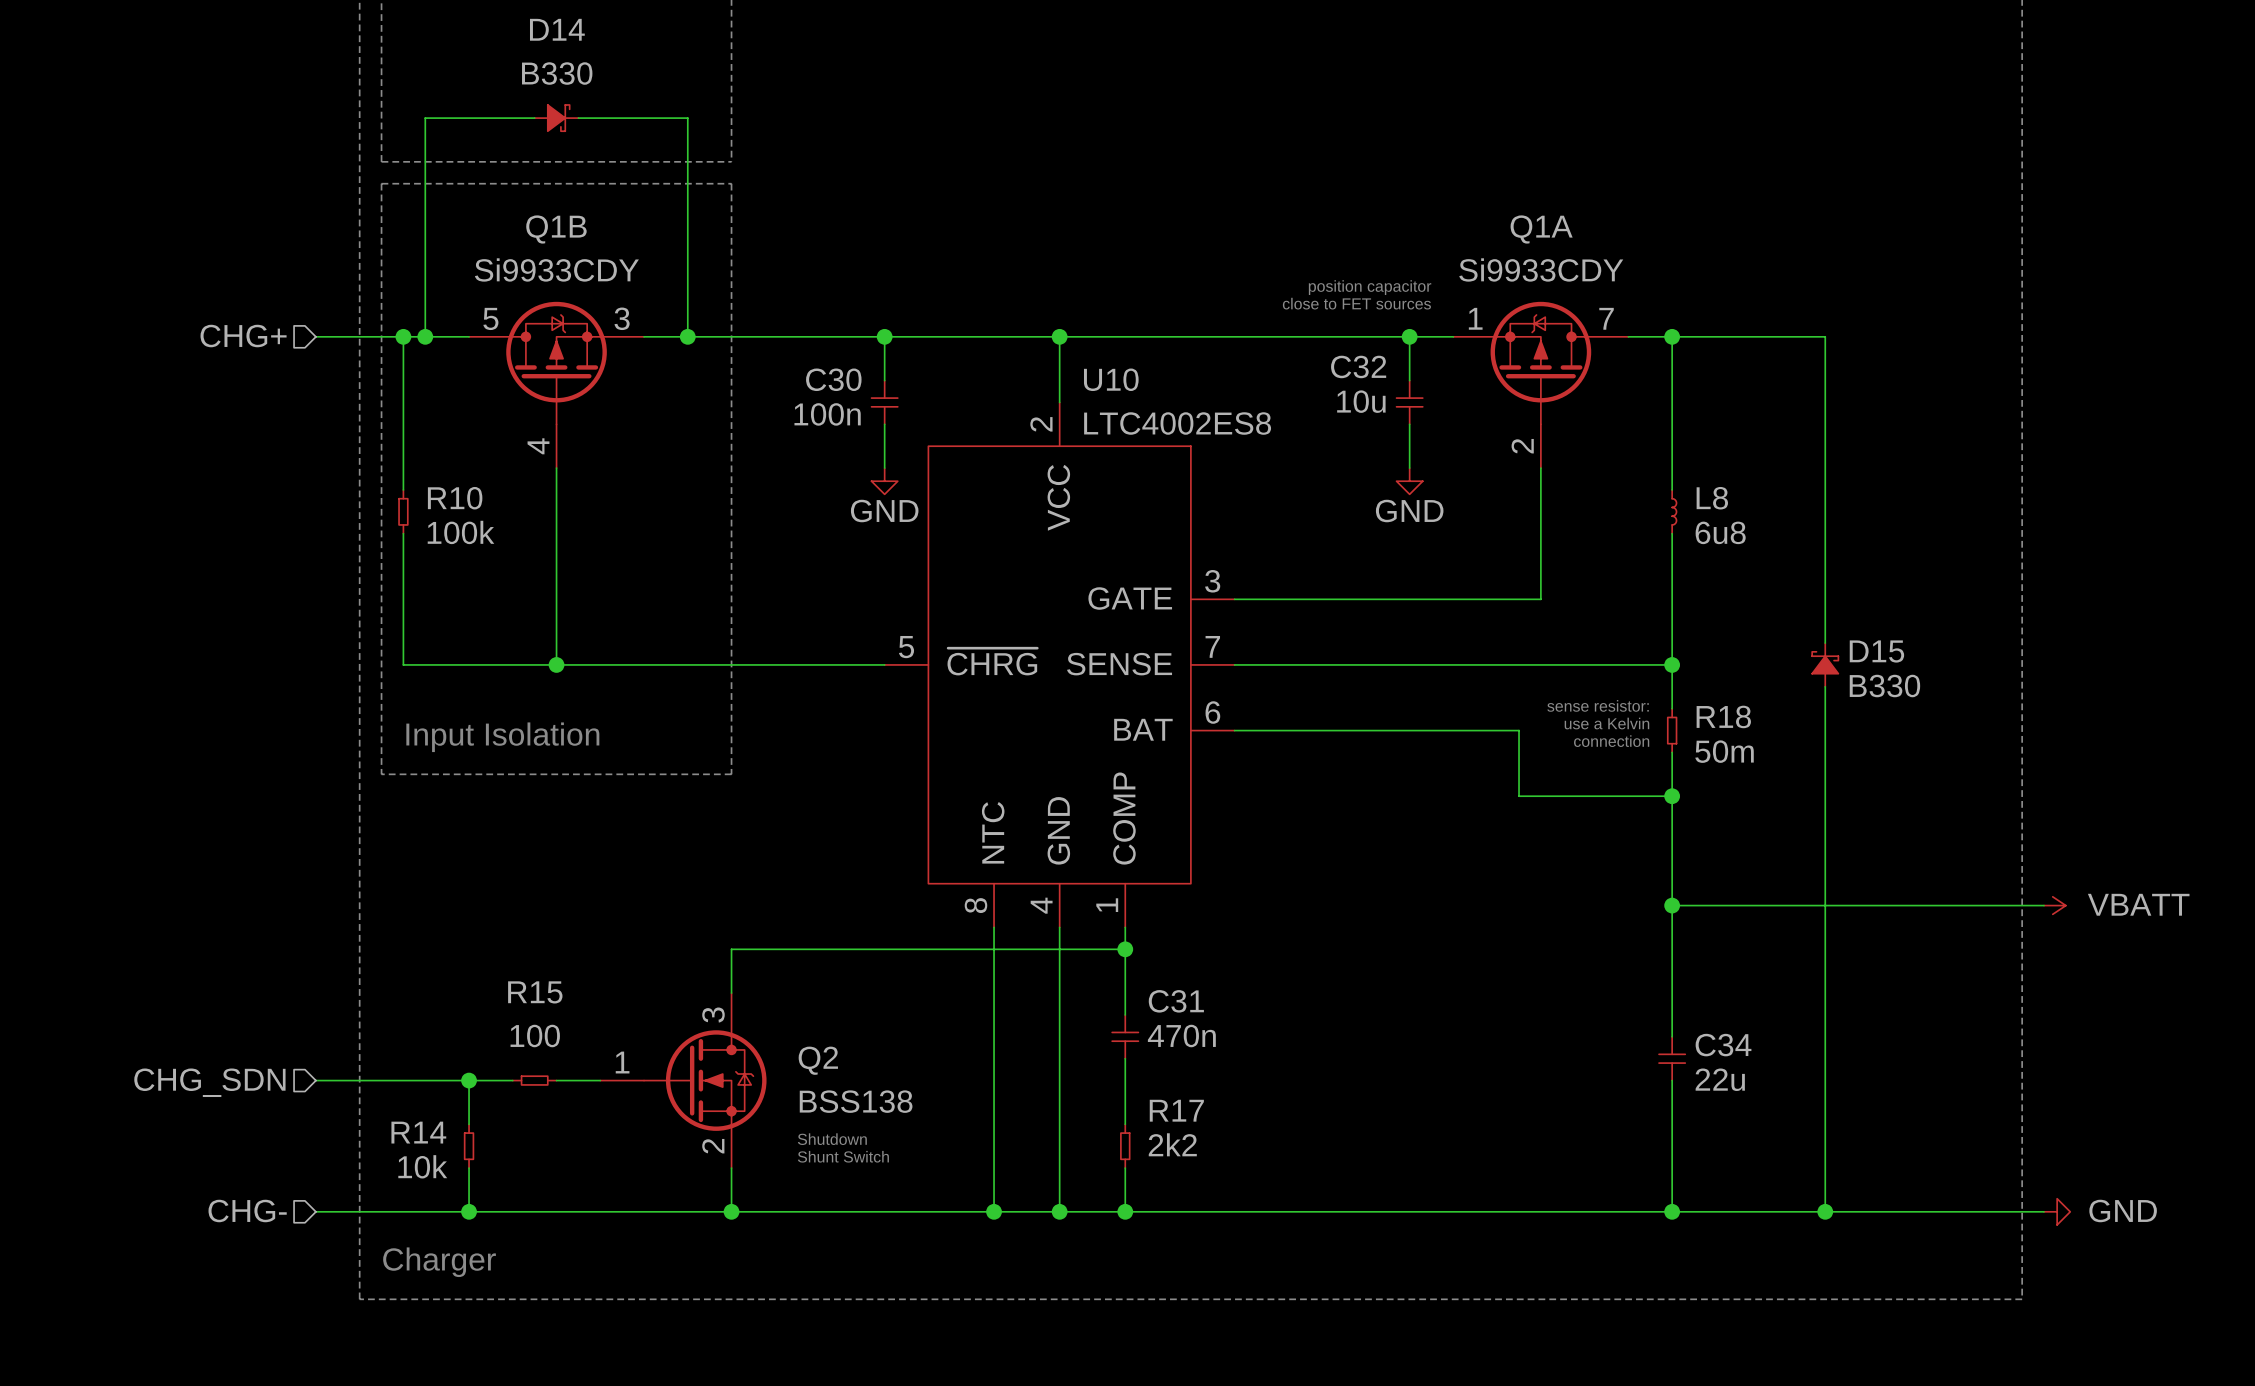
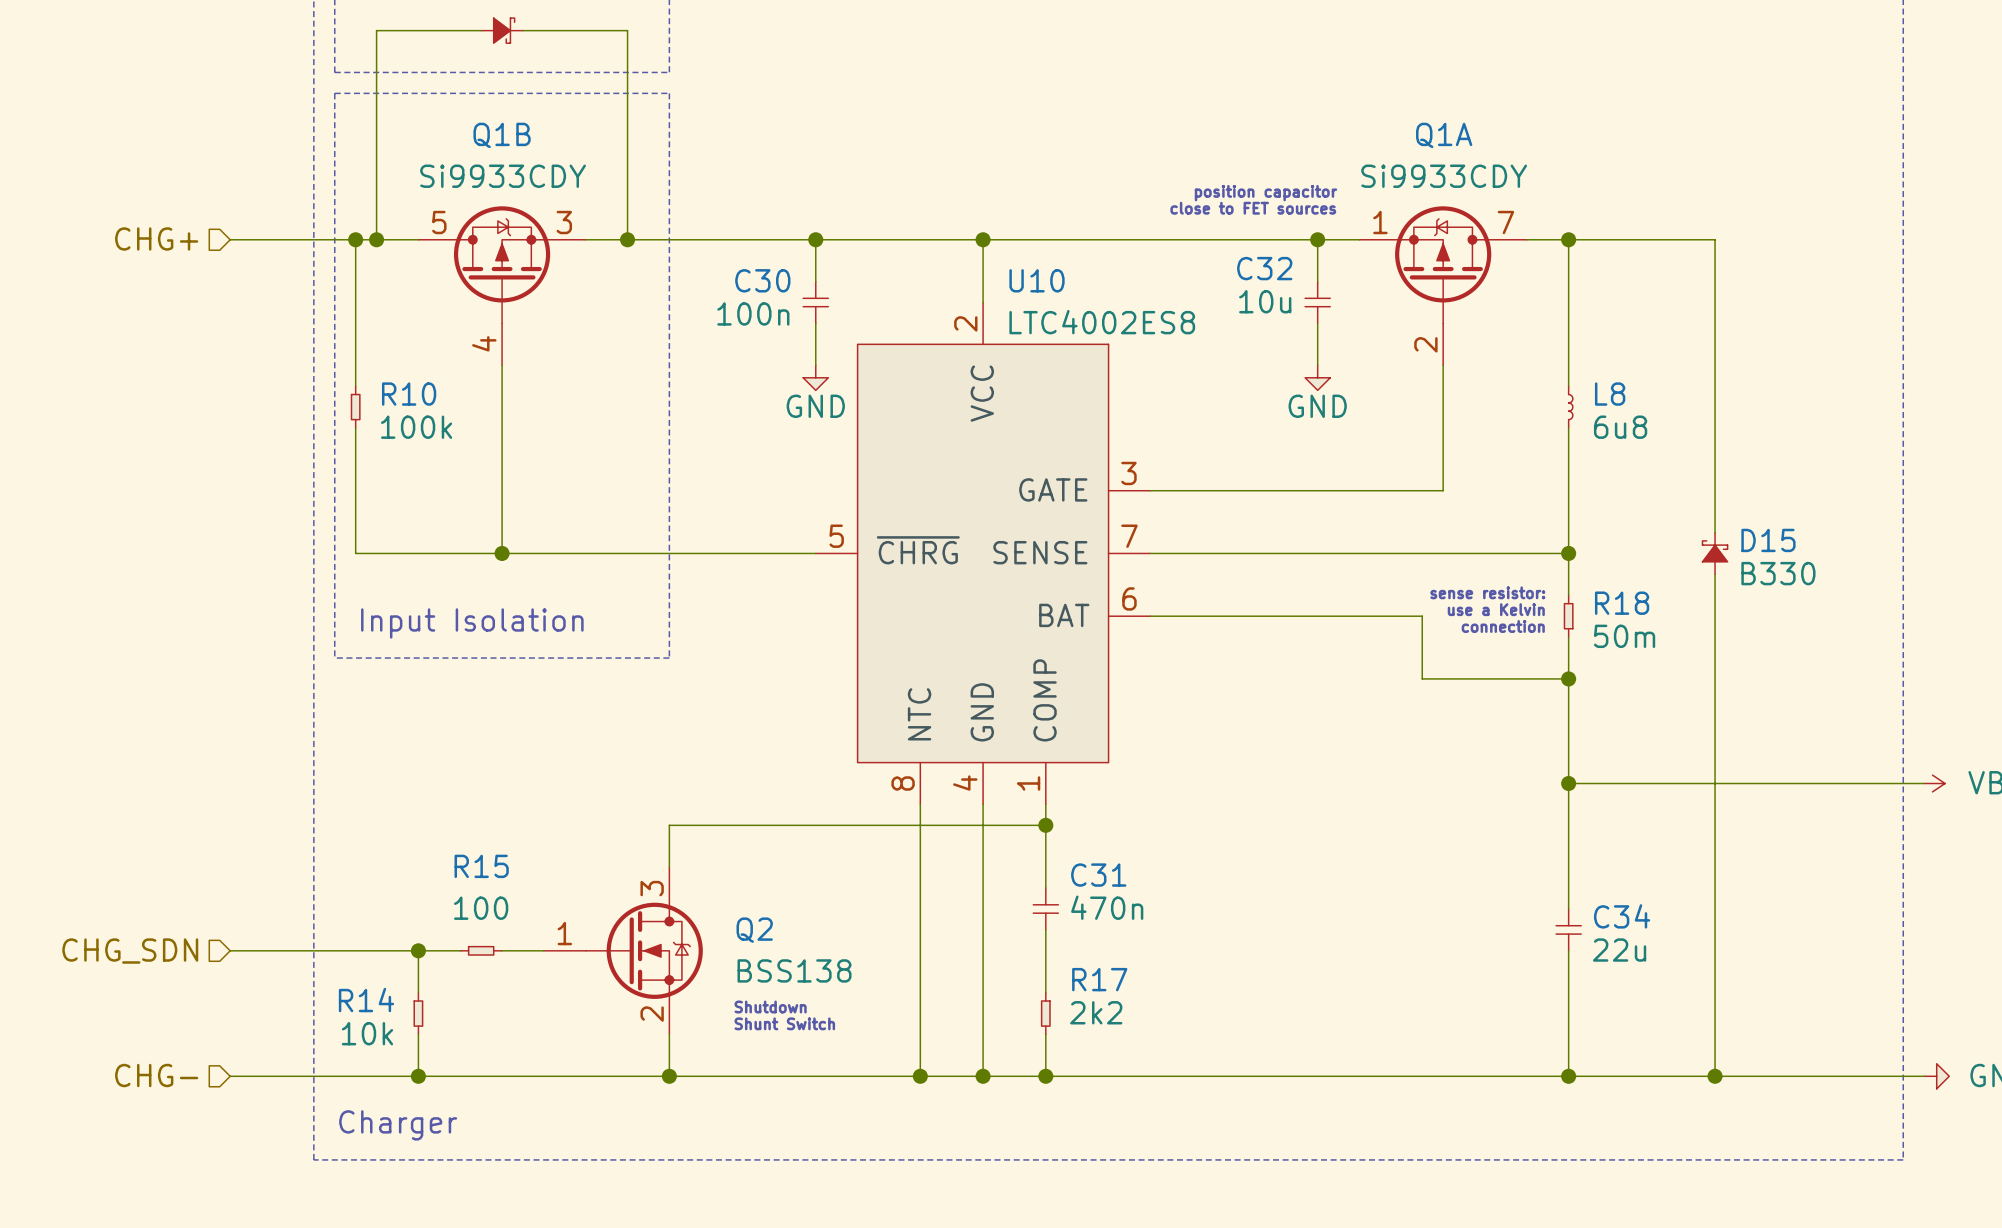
hierarchical label position: CHG+ (243, 336) -> CHG+ (156, 238)
wire: none -> (230, 239) (272, 239)
wire: none -> (230, 950) (272, 950)
hierarchical label position: CHG_SDN (209, 1082) -> CHG_SDN (130, 951)
hierarchical label position: CHG- (247, 1210) -> CHG- (156, 1075)
wire: none -> (230, 1076) (272, 1076)

